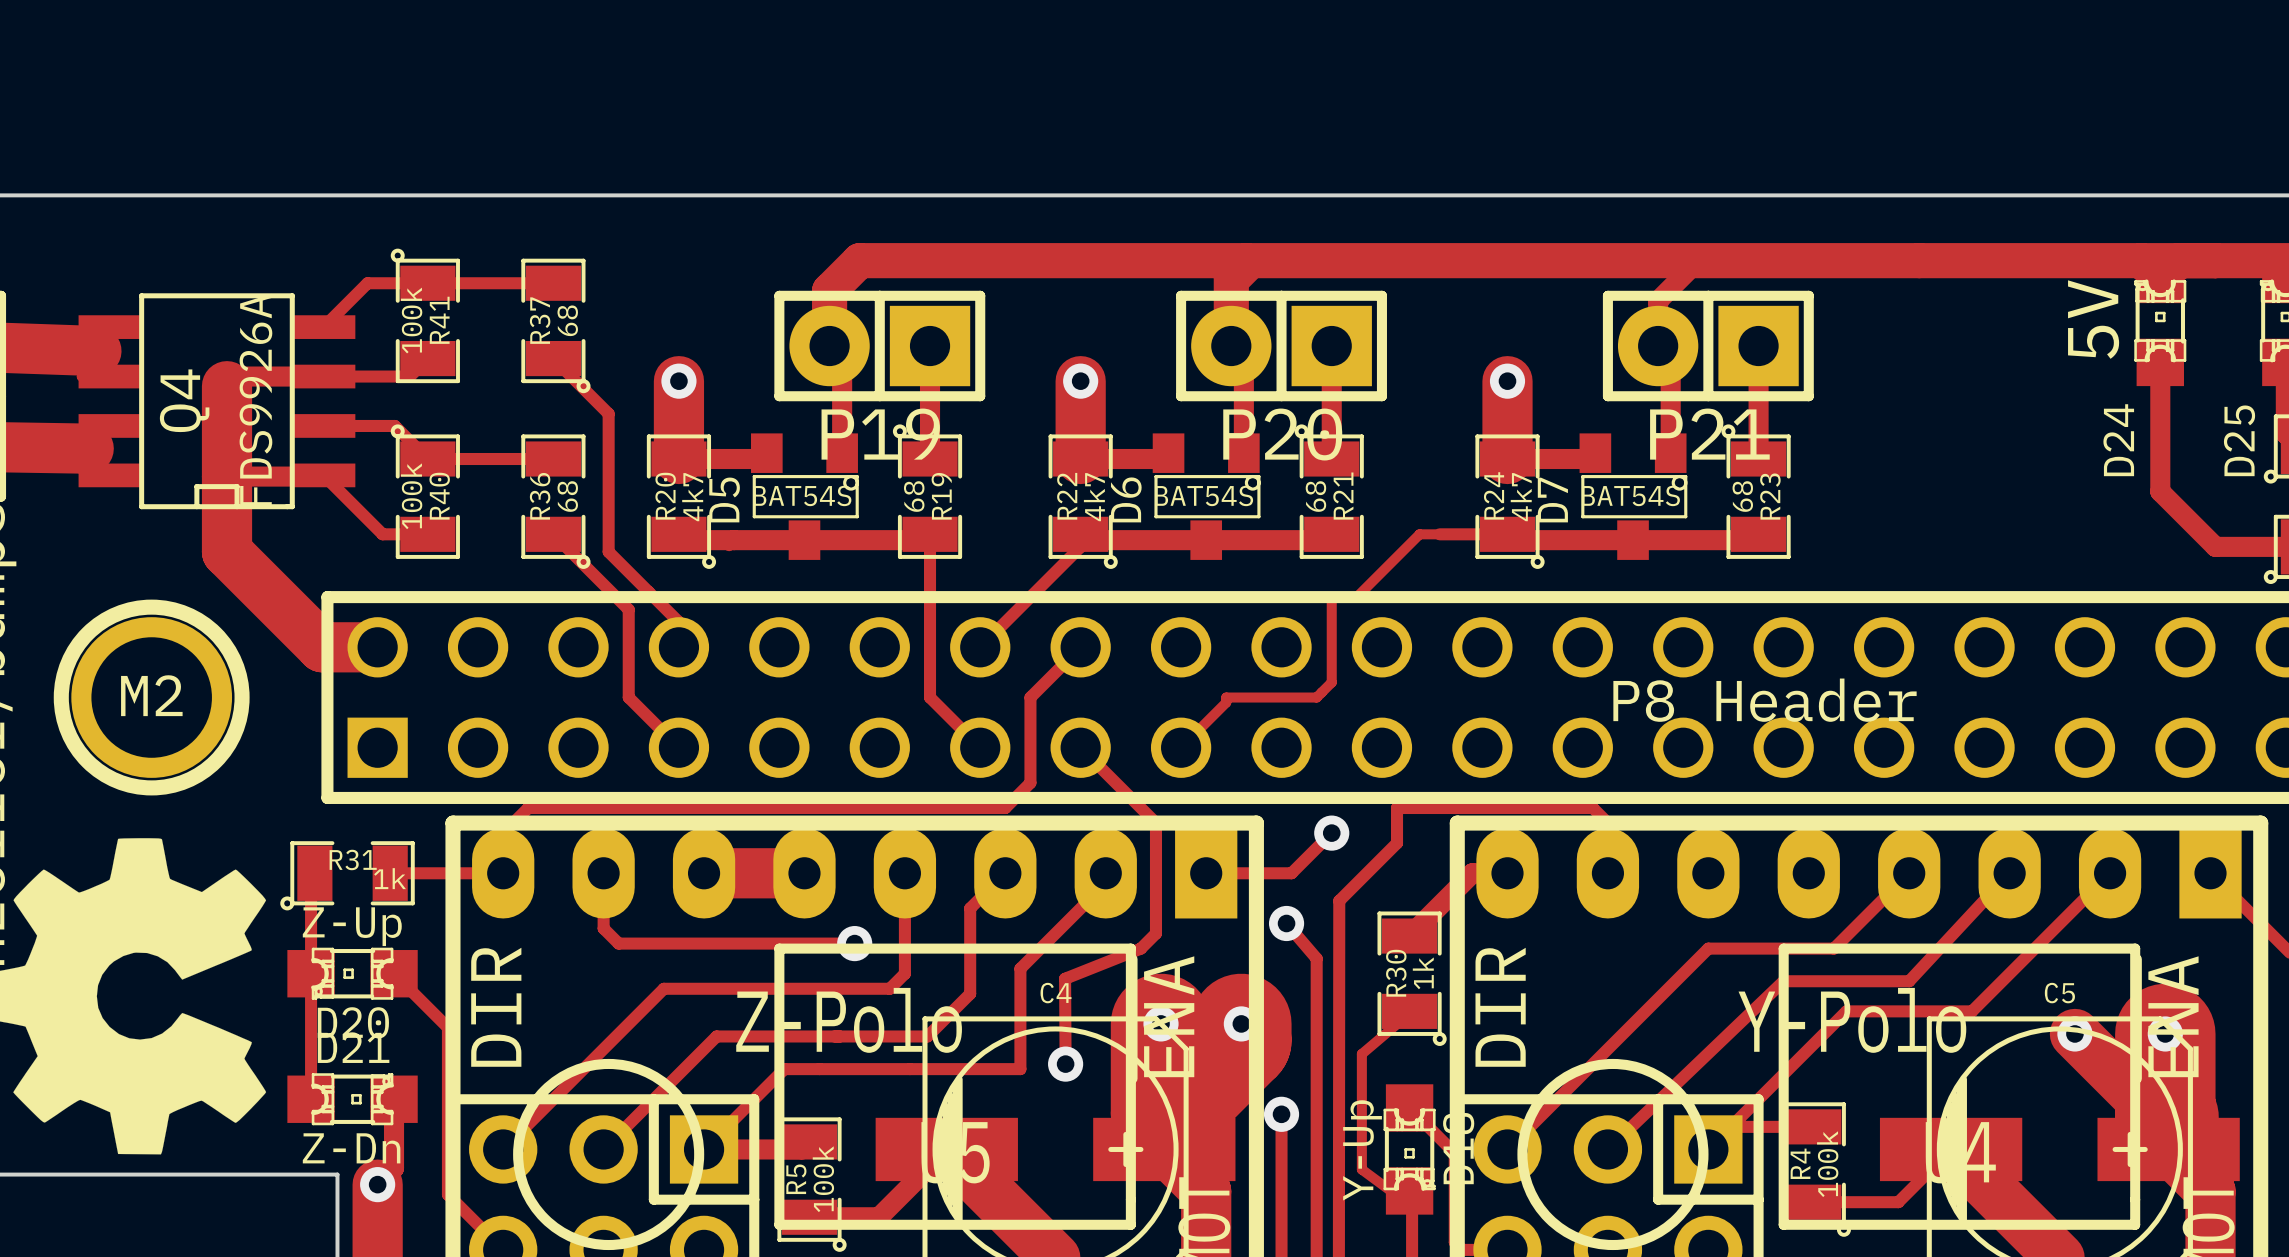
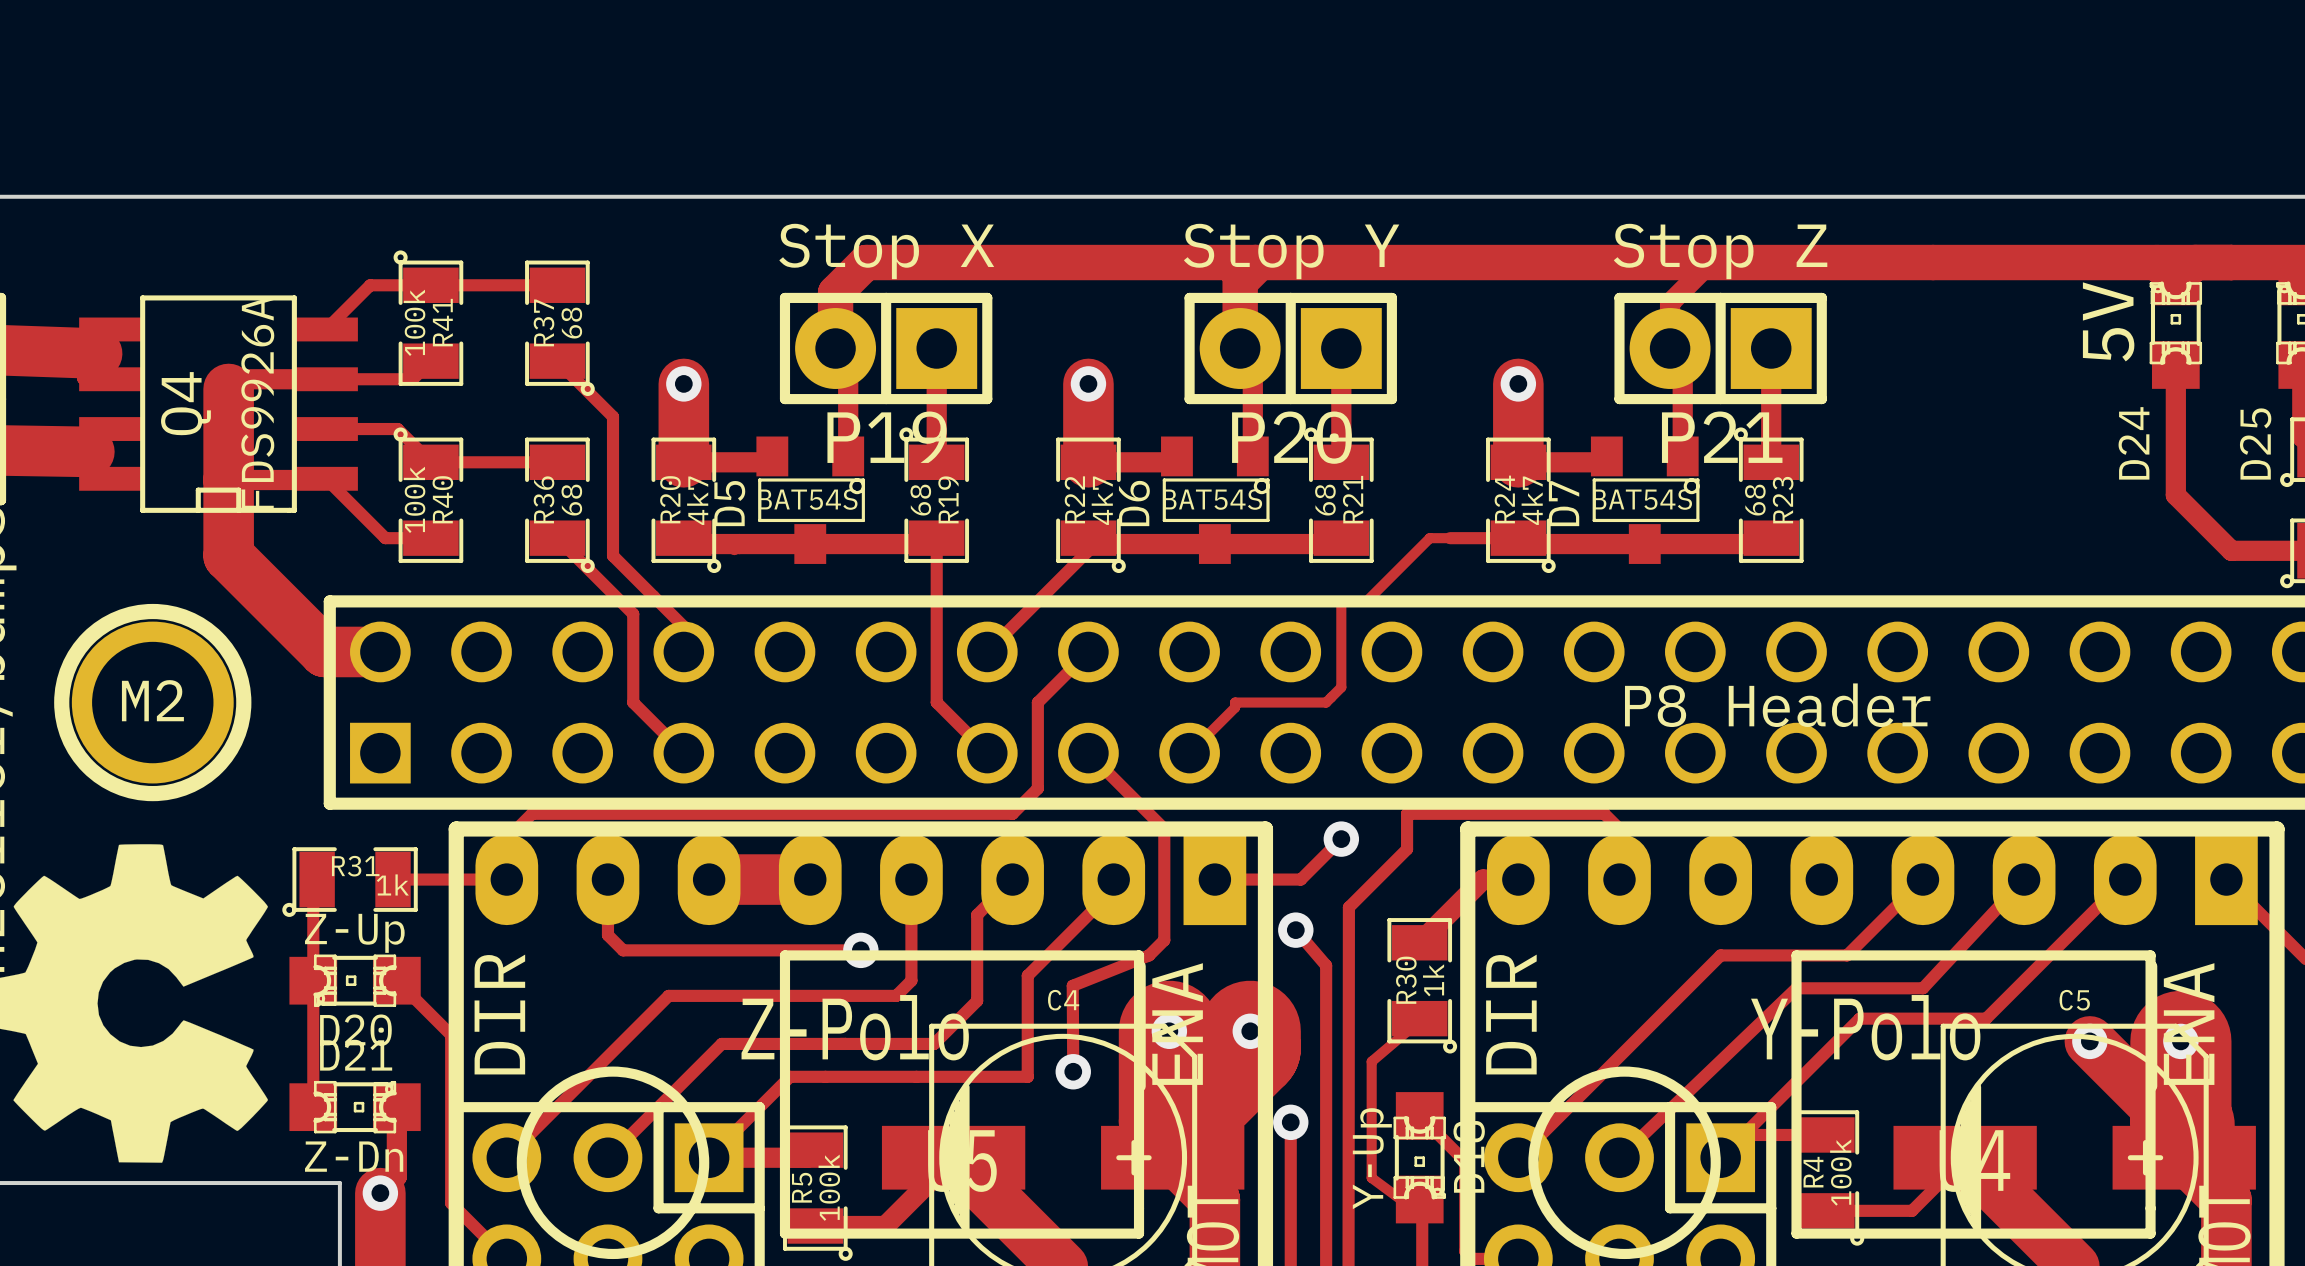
text: none -> Stop X (886, 251)
text: none -> Stop Y (1291, 251)
text: none -> Stop Z (1720, 251)

